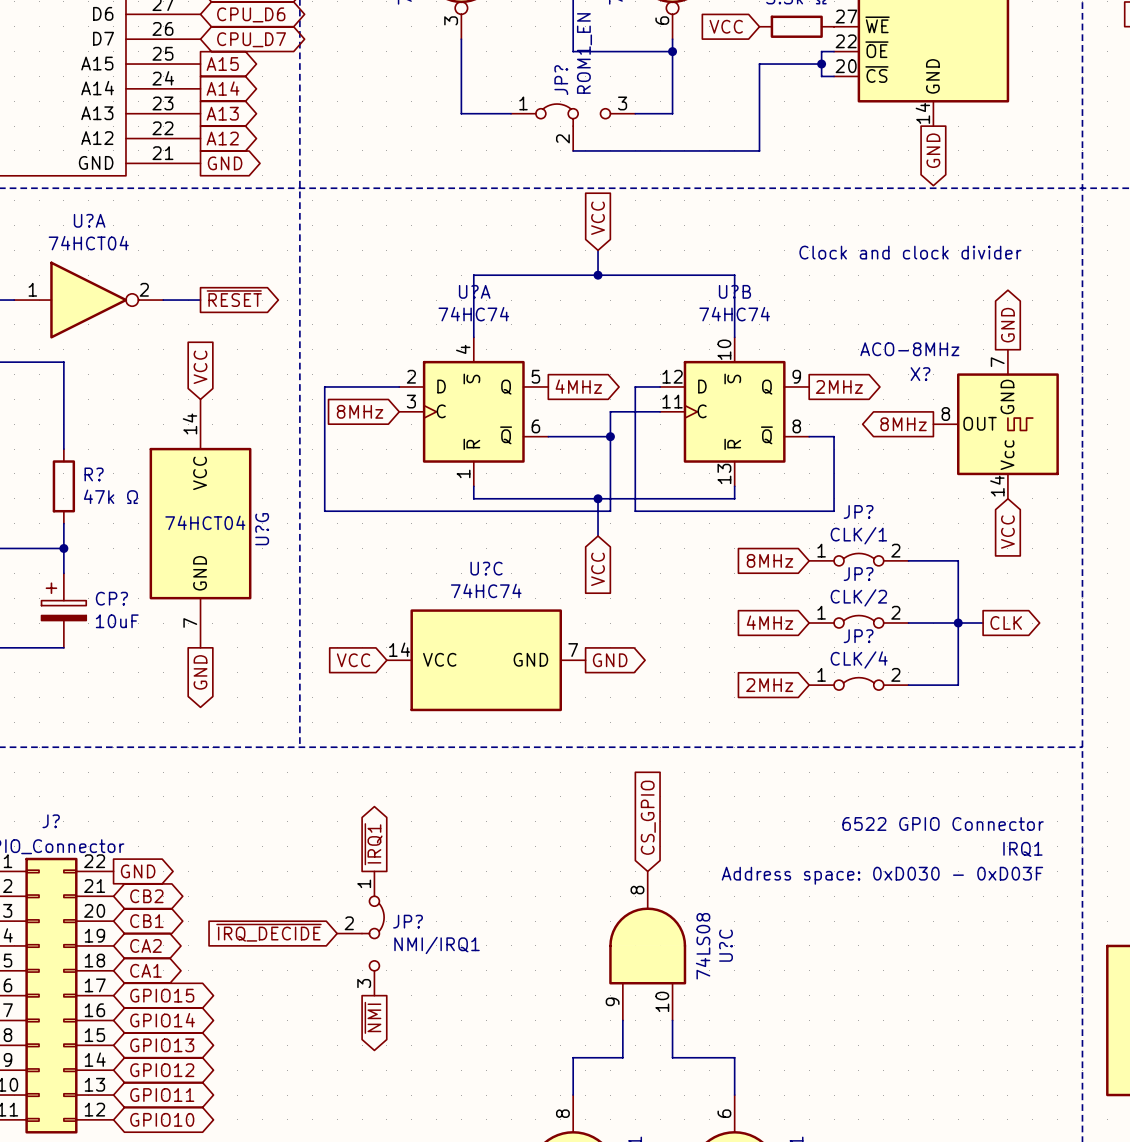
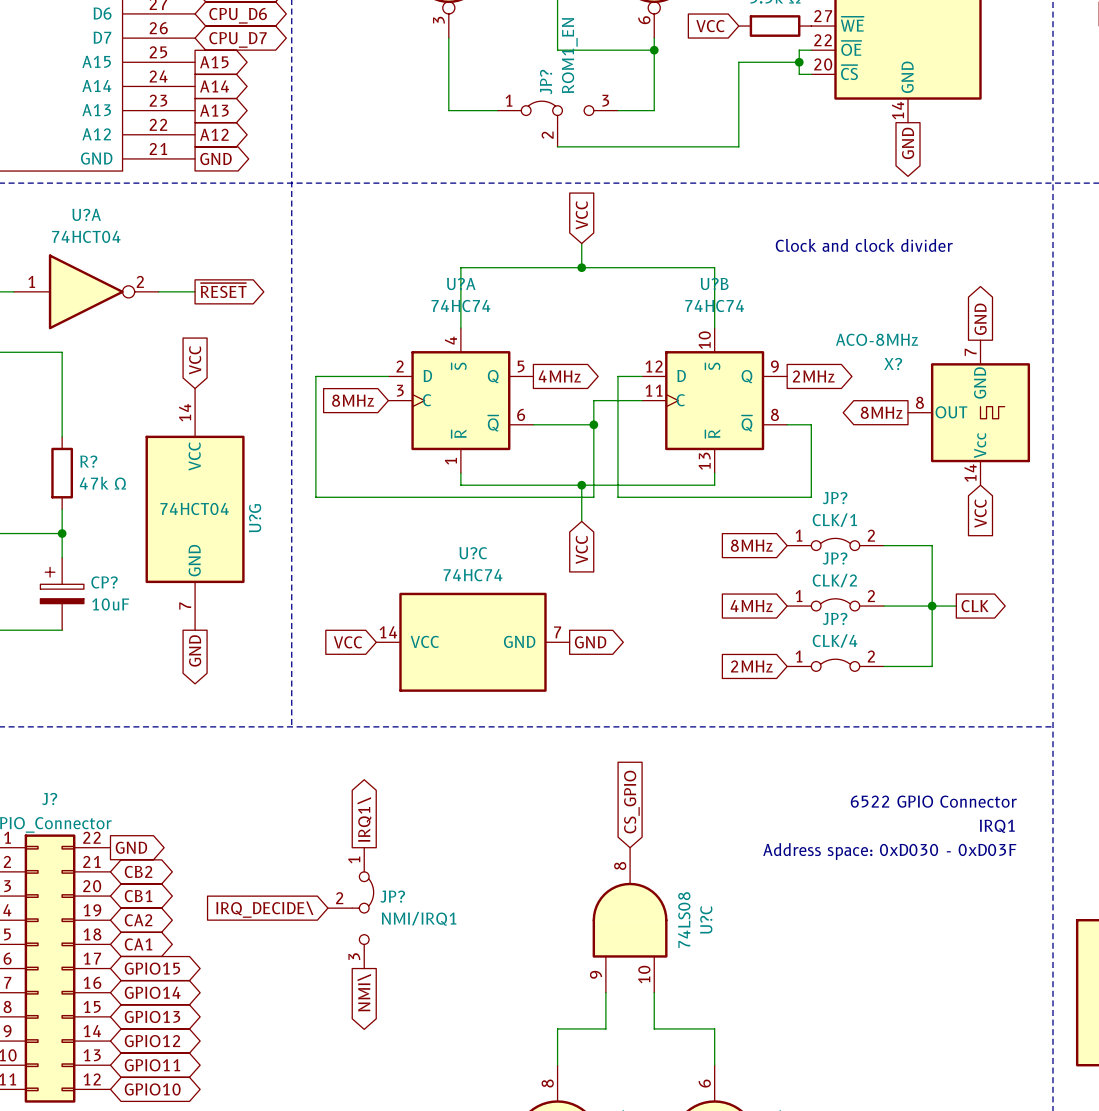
global label: ~{IRQ1} (373, 844) -> IRQ1\ (364, 819)
global label: ~{IRQ_DECIDE} (268, 932) -> IRQ_DECIDE\ (264, 909)
global label: ~{NMI} (372, 1017) -> NMI\ (364, 992)

